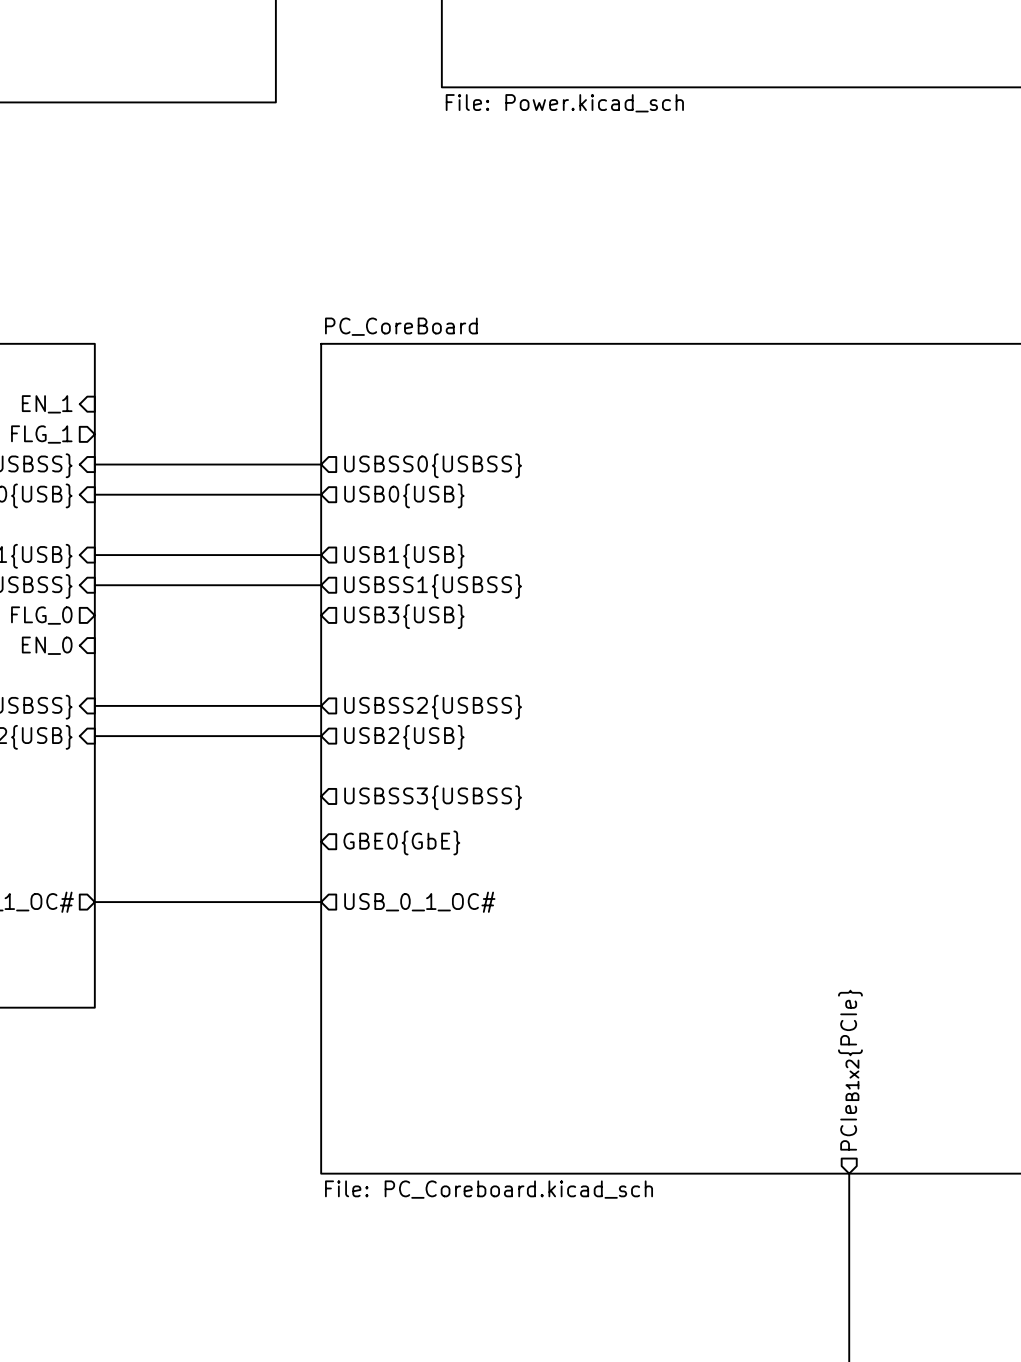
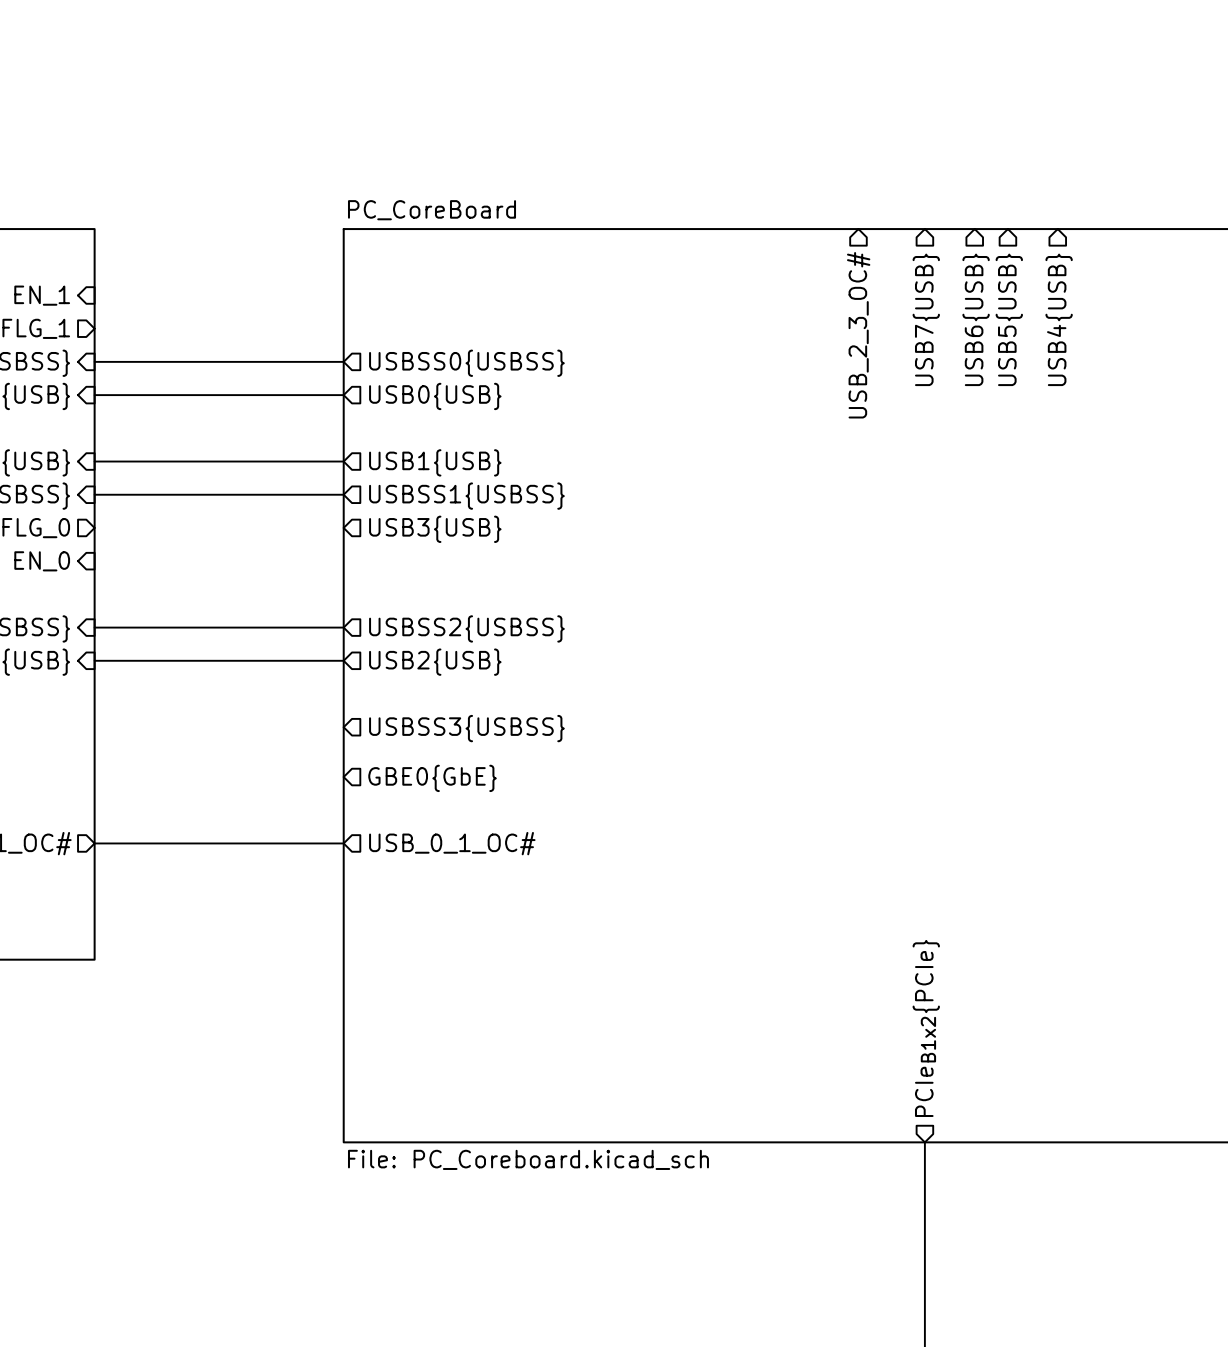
sheet pin: none -> USB7{USB} (926, 319)
sheet pin: none -> USB6{USB} (976, 319)
sheet pin: none -> USB5{USB} (1009, 319)
sheet pin: none -> USB4{USB} (1059, 319)
sheet pin: none -> USB_2_3_OC# (858, 335)

